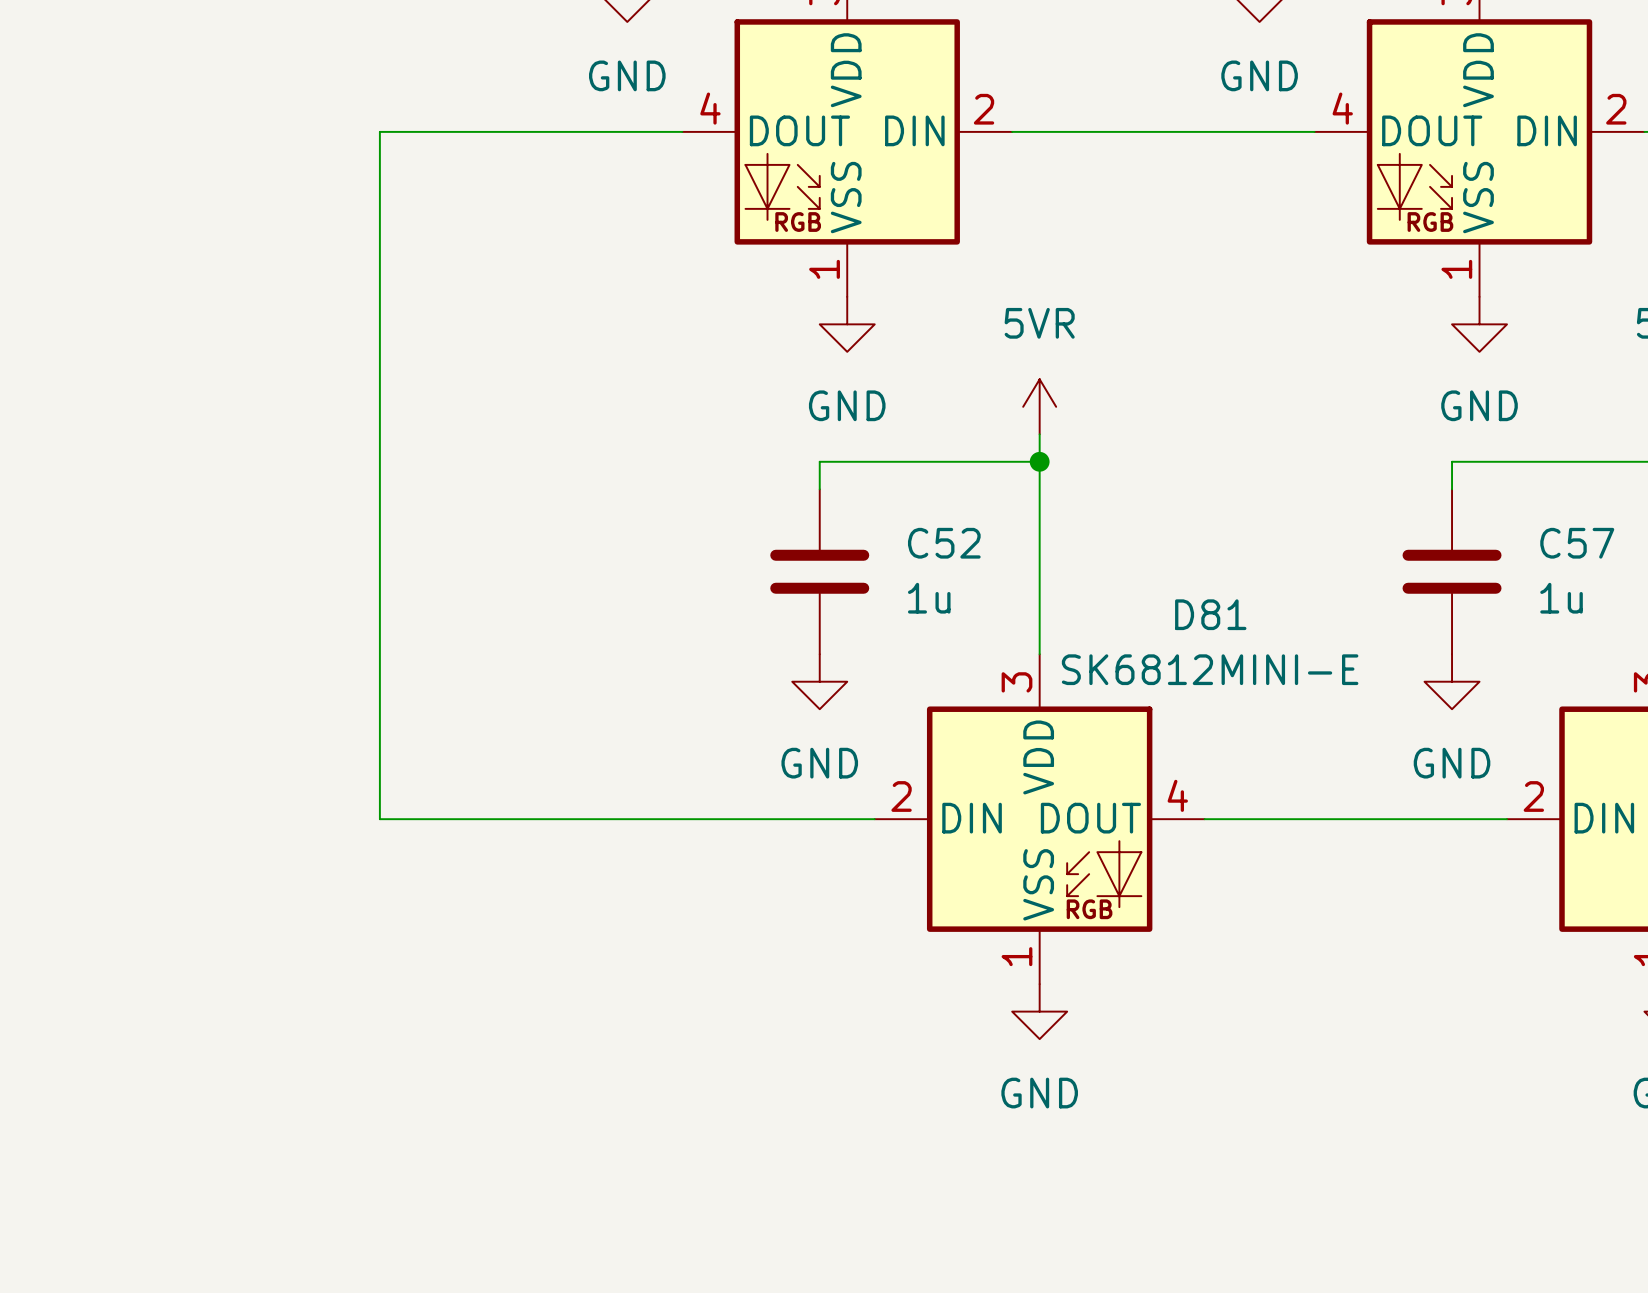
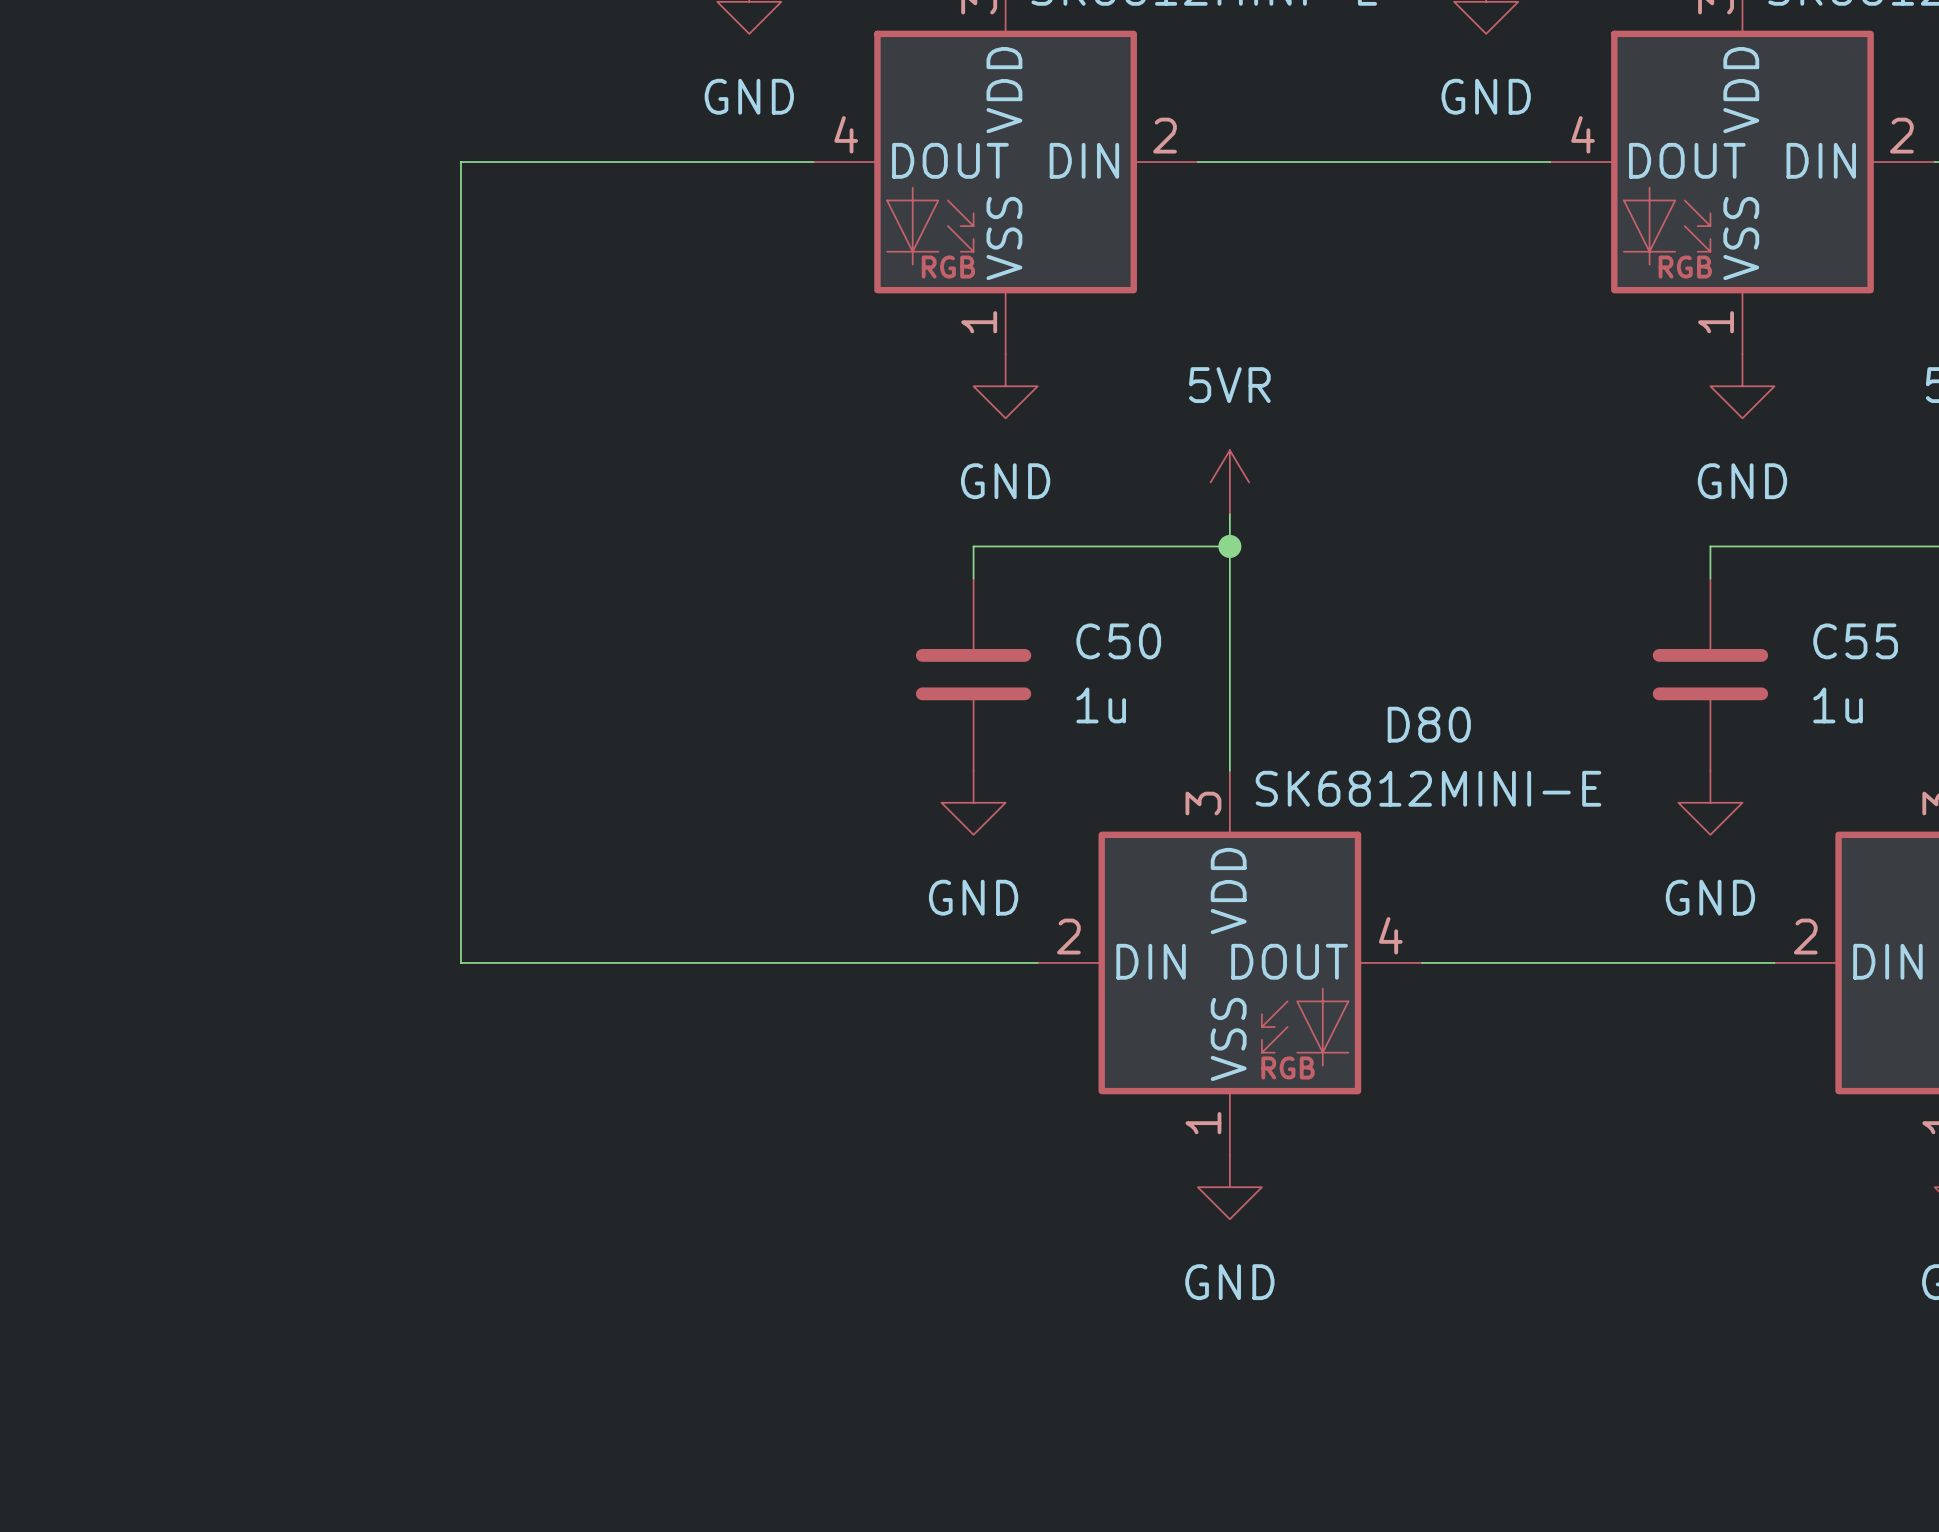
C52 name: C52 (944, 543) -> C50 (1118, 641)
C57 name: C57 (1577, 543) -> C55 (1855, 641)
D81 name: D81 (1210, 614) -> D80 (1429, 724)

